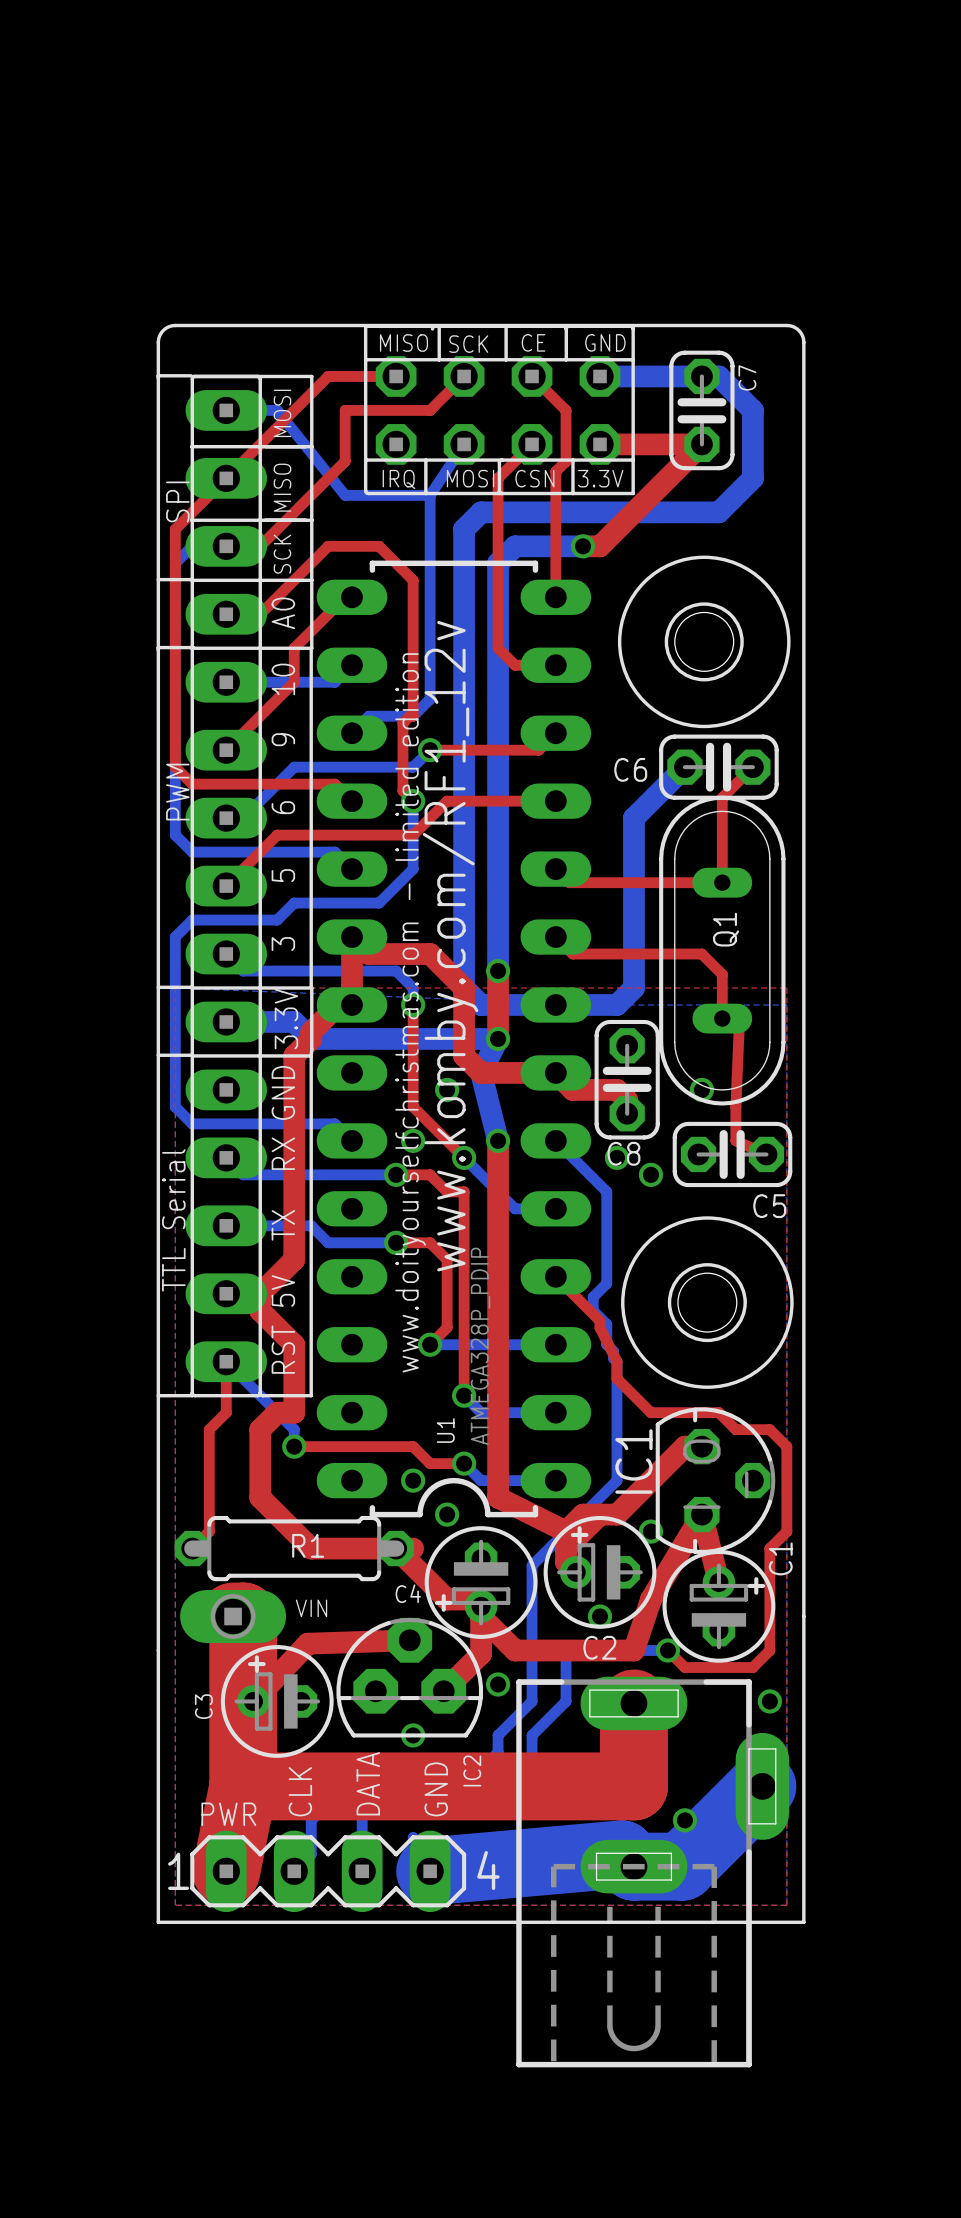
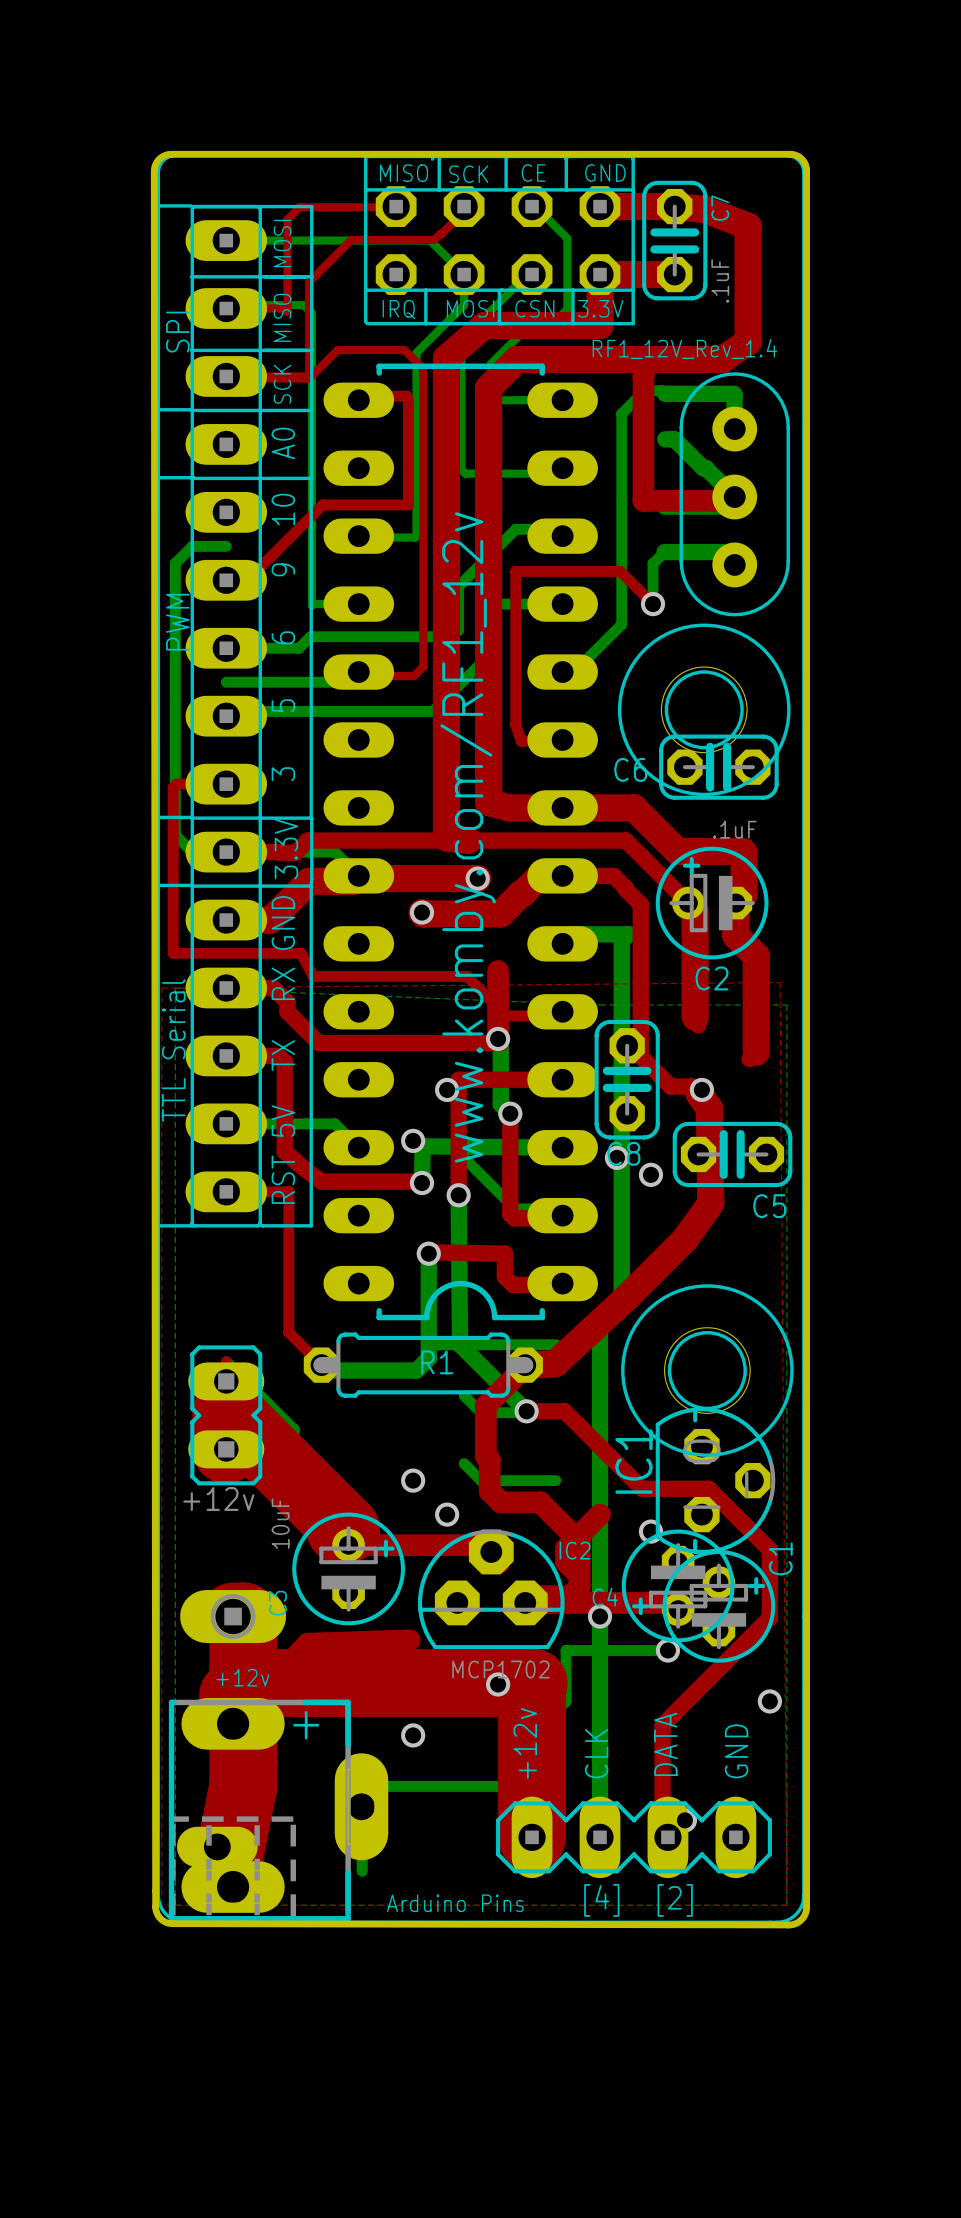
board edge: none -> (171, 154) (791, 154) (799, 157) (805, 164) (806, 1908) (803, 1917) (794, 1924) (172, 1923) (162, 1920) (156, 1913) (154, 171) (159, 159) (171, 154)
top track: none -> (396, 206) (299, 207) (287, 219) (287, 311) (284, 308) (226, 308)
top track: none -> (464, 206) (464, 211) (434, 239) (351, 239) (309, 282) (309, 377) (307, 378) (228, 378) (226, 376) (311, 376) (337, 349) (404, 349) (423, 368) (423, 666) (413, 676) (362, 676) (358, 672)
bottom track: none -> (532, 206) (535, 206) (567, 238) (567, 309) (552, 324) (530, 324) (491, 363) (491, 396) (495, 400) (562, 400)
top track: none -> (600, 206) (674, 206) (703, 209) (748, 226) (748, 341) (722, 359) (517, 359) (488, 388) (488, 802) (508, 807) (633, 807)
bottom track: none -> (226, 240) (430, 240) (464, 274) (464, 305) (416, 352) (416, 536) (358, 536)
bottom track: none -> (532, 274) (527, 274) (461, 340) (461, 469) (465, 473) (557, 473) (562, 468)
top track: none -> (674, 274) (600, 274) (600, 325) (484, 325) (446, 358) (446, 837) (468, 840)
C7 value: none -> .1uF (720, 281)
bottom track: none -> (226, 308) (229, 305) (303, 305) (311, 313) (311, 605) (358, 604)
text: none -> RF1_12V_Rev_1.4 (684, 348)
top track: none -> (660, 359) (650, 362) (643, 374) (643, 500) (727, 501) (734, 497)
top track: (396, 376) (328, 376) (175, 529) (175, 767) (192, 784) -> (562, 1011) (558, 1015) (506, 1015) (466, 976) (313, 976) (301, 953) (173, 953) (173, 787) (176, 784) (192, 784)
top track: (464, 376) (430, 410) (345, 410) (345, 461) (260, 546) (226, 546) -> none
top track: (532, 376) (566, 410) (566, 461) (555, 471) (555, 597) -> none
bottom track: (600, 376) (718, 376) (752, 410) (752, 478) (718, 512) (481, 512) (464, 529) (464, 988) (481, 1004) (616, 1004) (633, 988) (633, 818) (684, 767) -> none
top track: none -> (358, 400) (362, 396) (407, 396) (408, 504) (322, 504) (247, 580) (226, 580)
bottom track: (226, 410) (277, 410) (345, 495) (430, 495) -> none
C7 position: (701, 410) -> (674, 240)
bottom track: none -> (734, 428) (733, 393) (665, 393) (662, 390) (644, 390) (621, 413) (621, 624) (574, 672) (562, 672)
bottom track: none -> (665, 439) (674, 439) (734, 497) (725, 506) (664, 506)
bottom track: (464, 444) (430, 495) -> none
top track: (532, 444) (498, 478) (498, 648) (515, 665) (555, 665) -> none
top track: (600, 444) (701, 444) (600, 546) (583, 546) -> none
part: none -> (734, 494)
bottom track: (430, 495) (430, 699) (413, 716) (368, 716) (351, 733) -> none
bottom track: none -> (562, 536) (555, 529) (515, 529) (458, 586) (458, 629) (451, 636) (310, 636) (298, 648) (226, 648)
bottom track: (583, 546) (515, 546) (498, 563) (498, 971) -> none
via position: (583, 546) -> (653, 604)
bottom track: none -> (734, 564) (721, 552) (664, 552) (653, 563) (653, 604)
top track: (351, 597) (345, 597) (294, 648) (294, 682) (226, 750) -> none
bottom track: none -> (562, 604) (499, 604) (495, 608) (495, 648) (432, 711) (231, 711) (226, 716)
top track: none -> (653, 604) (620, 571) (515, 571) (515, 725) (521, 741) (562, 739)
top track: (226, 614) (260, 614) (328, 546) (379, 546) (413, 580) (413, 716) (409, 716) (402, 723) (402, 790) (413, 801) -> none
top track: (555, 733) (538, 750) (430, 750) -> none
bottom track: (430, 750) (413, 767) (294, 767) (243, 818) (226, 818) -> none
via: (430, 750) -> none
top track: (752, 767) (722, 797) (722, 882) (569, 882) (555, 869) -> none
top track: (226, 784) (335, 784) (351, 801) -> none
bottom track: (413, 801) (413, 869) (379, 903) (294, 903) (277, 920) (192, 920) (175, 937) (175, 1106) (192, 1123) (226, 1123) -> none
via: (413, 801) -> none
top track: (555, 801) (447, 801) (413, 835) (277, 835) (226, 886) -> none
top track: none -> (633, 807) (677, 851) (744, 852) (744, 894) (735, 903) (735, 935) (756, 956) (756, 1052) (749, 1059)
C2 value: none -> .1uF (734, 829)
part: none -> (460, 841)
top track: none -> (226, 852) (295, 852) (307, 840) (625, 840) (695, 911) (695, 1017) (698, 1025)
top track: none -> (477, 878) (361, 878) (358, 875) (353, 881) (309, 881) (270, 920) (226, 920)
via: none -> (477, 878)
top track: none -> (421, 912) (500, 913) (540, 875) (613, 875) (640, 904) (640, 1056) (670, 1086) (691, 1086) (709, 1108) (710, 1203) (684, 1239) (627, 1297) (555, 1363) (525, 1365) (485, 1405) (485, 1456) (489, 1459) (489, 1491) (500, 1502) (540, 1502) (579, 1541) (579, 1586) (570, 1596) (532, 1596) (525, 1602) (671, 1602) (678, 1609)
via: none -> (421, 912)
top track: (555, 937) (572, 954) (701, 954) (722, 974) (722, 1018) (739, 1025) (735, 1140) (766, 1154) -> none
bottom track: none -> (562, 943) (572, 934) (628, 934) (621, 941) (621, 1298) (600, 1320) (600, 1837)
text position: www.komby.com/RF1_12v (450, 946) -> www.komby.com/RF1_12v (468, 837)
Q1: (722, 950) -> none
bottom track: (226, 954) (243, 971) (396, 971) (413, 988) (413, 1004) -> none
via: (498, 971) -> none
top track: none -> (226, 988) (273, 988) (287, 1002) (287, 1011) (318, 1043) (500, 1043)
top track: (351, 991) (311, 1032) (311, 1038) (294, 1055) (294, 1259) (260, 1293) -> none
top track: (362, 1004) (351, 1004) (351, 937) (368, 954) (430, 954) (464, 988) (464, 1055) (481, 1072) (555, 1072) (572, 1089) (616, 1089) (627, 1100) (627, 1113) -> none
top track: (413, 1004) (413, 1106) (464, 1157) -> none
via: (413, 1004) -> none
text: www.doityourselfchristmas.com - limited edition (410, 1012) -> none
bottom track: (226, 1021) (294, 1021) (311, 1038) (498, 1038) (481, 1072) (498, 1140) -> none
U1: ATMEGA328P_PDIP (453, 1038) -> none
part: none -> (481, 1038)
bottom track: none -> (500, 1043) (500, 1104) (510, 1113)
top track: none -> (226, 1055) (278, 1055) (284, 1062) (284, 1151) (321, 1181) (421, 1183)
top track: none -> (562, 1079) (458, 1079) (458, 1195)
top track: none -> (510, 1113) (510, 1214) (514, 1218) (559, 1218) (562, 1215)
part: (481, 1123) -> none
top track: (498, 1140) (498, 1497) (566, 1531) (583, 1514) (616, 1514) (684, 1446) (701, 1446) -> none
via position: (498, 1140) -> (510, 1113)
bottom track: (555, 1140) (606, 1191) (606, 1283) (593, 1297) (593, 1310) (606, 1324) (606, 1344) (613, 1351) (613, 1358) (616, 1361) (616, 1480) (532, 1565) (532, 1701) (498, 1735) (498, 1752) (481, 1769) (362, 1769) (311, 1820) (311, 1854) (294, 1871) -> none
bottom track: none -> (562, 1147) (422, 1146) (421, 1183)
bottom track: (226, 1157) (243, 1174) (396, 1174) -> none
via: (464, 1157) -> none
top track: (396, 1174) (430, 1174) (447, 1191) (464, 1191) (464, 1395) -> none
via: (396, 1174) -> none
via: none -> (421, 1183)
top track: none -> (226, 1191) (288, 1191) (288, 1332) (321, 1365)
bottom track: none -> (458, 1195) (460, 1344) (526, 1411)
via: none -> (458, 1195)
bottom track: (226, 1225) (311, 1225) (328, 1242) (396, 1242) -> none
top track: (396, 1242) (430, 1242) (447, 1259) (447, 1327) (430, 1344) -> none
via: (396, 1242) -> none
bottom track: none -> (428, 1253) (428, 1358) (416, 1370) (326, 1370) (311, 1355)
top track: none -> (428, 1253) (504, 1253) (504, 1276) (513, 1284) (562, 1283)
via: none -> (428, 1253)
top track: (555, 1276) (600, 1320) (600, 1327) (616, 1361) (616, 1378) (650, 1412) (718, 1412) (735, 1429) (769, 1429) (786, 1446) (786, 1531) (769, 1549) -> (526, 1411) (564, 1411) (642, 1488) (708, 1488) (769, 1549)
top track: (260, 1293) (260, 1310) (294, 1344) (294, 1412) (277, 1412) (260, 1429) (260, 1497) (311, 1548) (413, 1548) -> none
via: (430, 1344) -> none
via: (464, 1395) -> none
via: none -> (526, 1411)
top track: (226, 1412) (209, 1429) (209, 1531) (192, 1548) -> (226, 1412) (226, 1449) (229, 1412) (345, 1529) (340, 1529)
part: none -> +12v (226, 1415)
top track: (294, 1446) (413, 1446) (430, 1463) (464, 1463) -> none
via: (294, 1446) -> none
via: (464, 1463) -> none
top track: none -> (336, 1520) (348, 1532) (348, 1545) (482, 1545) (499, 1562) (491, 1551)
C3 value: none -> 10uF (280, 1523)
R1 position: (294, 1548) -> (423, 1365)
top track: (396, 1548) (447, 1599) (474, 1599) (481, 1606) (481, 1653) (443, 1691) -> none
top track width: thin (769, 1549) (769, 1617) -> thick (769, 1549) (769, 1617)
C2 position: (600, 1572) -> (712, 903)
C4 position: (481, 1582) -> (678, 1585)
top track: (718, 1582) (701, 1514) (650, 1599) (633, 1650) (515, 1650) (481, 1616) -> none
text: VIN (311, 1608) -> none
top track: (769, 1617) (769, 1650) (752, 1667) (684, 1667) (667, 1650) -> (769, 1617) (662, 1725) (662, 1831) (667, 1837)
IC2 value: none -> MCP1702 (500, 1669)
text: none -> +12v (242, 1677)
IC2 position: (409, 1677) -> (491, 1589)
top track: none -> (233, 1695) (245, 1683) (533, 1683) (532, 1837)
C3 rotation: 0° (277, 1701) -> 90° clockwise (348, 1568)
C3 position: (277, 1701) -> (348, 1568)
top track: (633, 1703) (633, 1786) (243, 1786) -> none
text: none -> +12v (525, 1743)
IC2 name rotation: 0° (472, 1770) -> 90° clockwise (575, 1550)
IC2 name position: IC2 (472, 1770) -> IC2 (575, 1550)
text position: DATA (368, 1783) -> DATA (665, 1744)
bottom track: (762, 1786) (682, 1866) (633, 1866) (621, 1854) (430, 1871) (413, 1837) -> none
text position: GND (436, 1789) -> GND (736, 1751)
text position: CLK (300, 1791) -> CLK (596, 1753)
part: none -> (278, 1809)
text: PWR (228, 1814) -> none
part: none -> (633, 1837)
part: (328, 1871) -> none
part: (652, 1872) -> none
text: none -> [4] (601, 1900)
text: none -> [2] (675, 1900)
text: none -> Arduino Pins (455, 1903)
top zone outline: (175, 1905) (175, 988) (786, 988) (786, 1905) -> (175, 1905) (161, 1905) (161, 988) (780, 982) (786, 1905)

